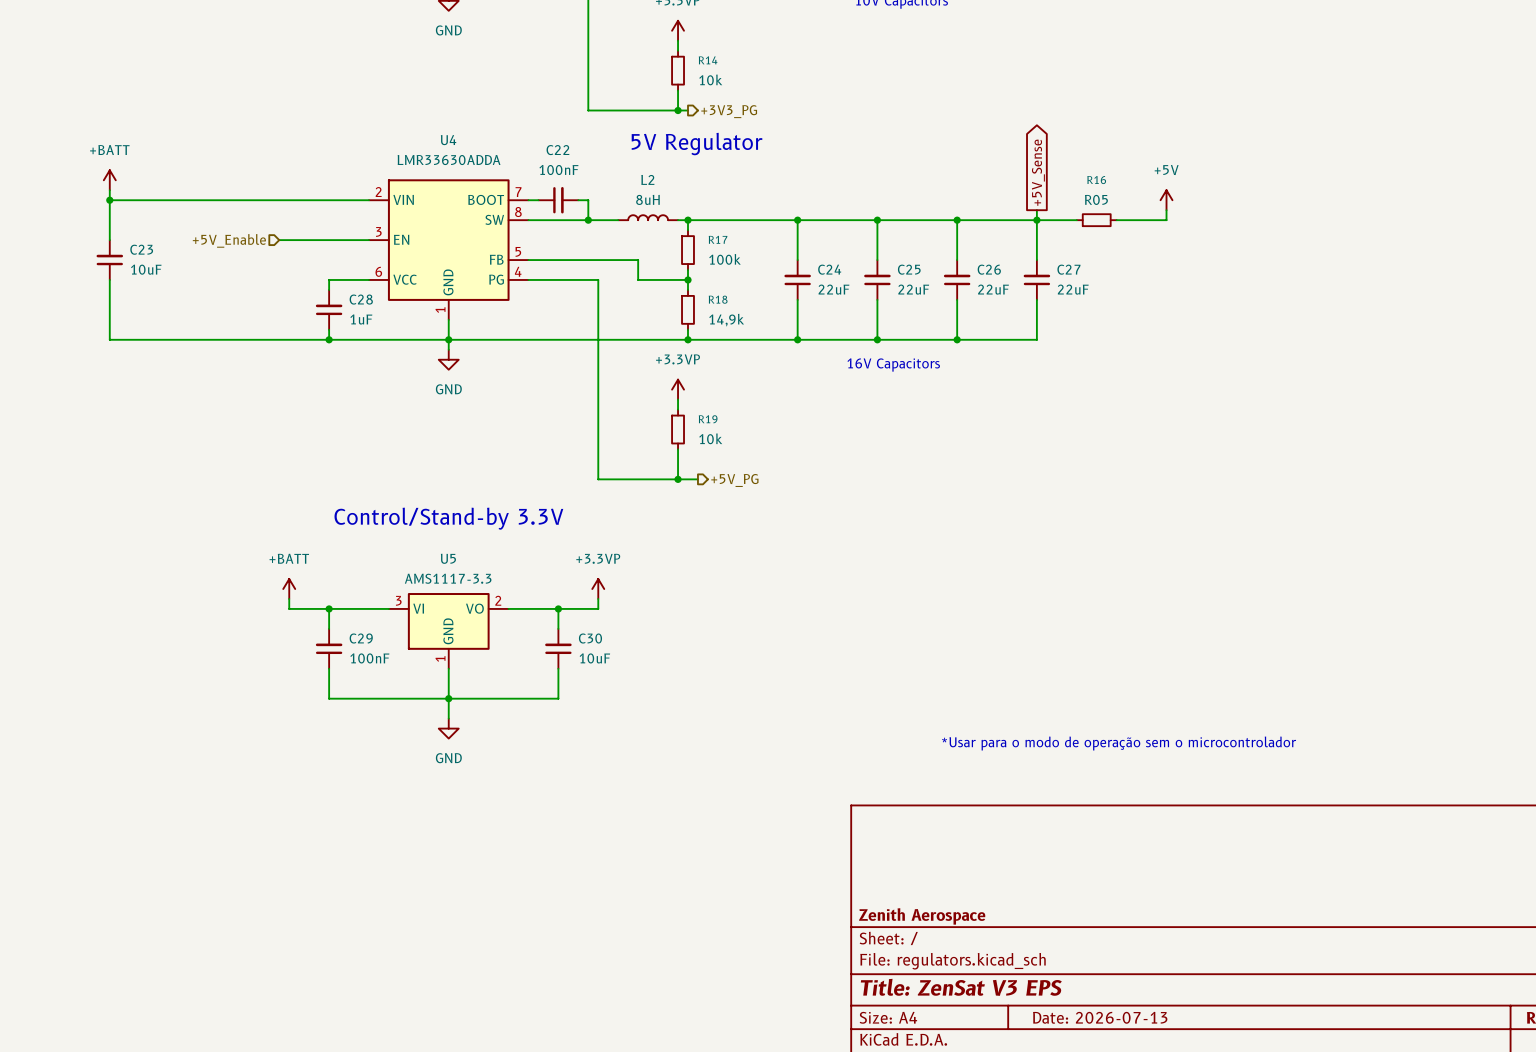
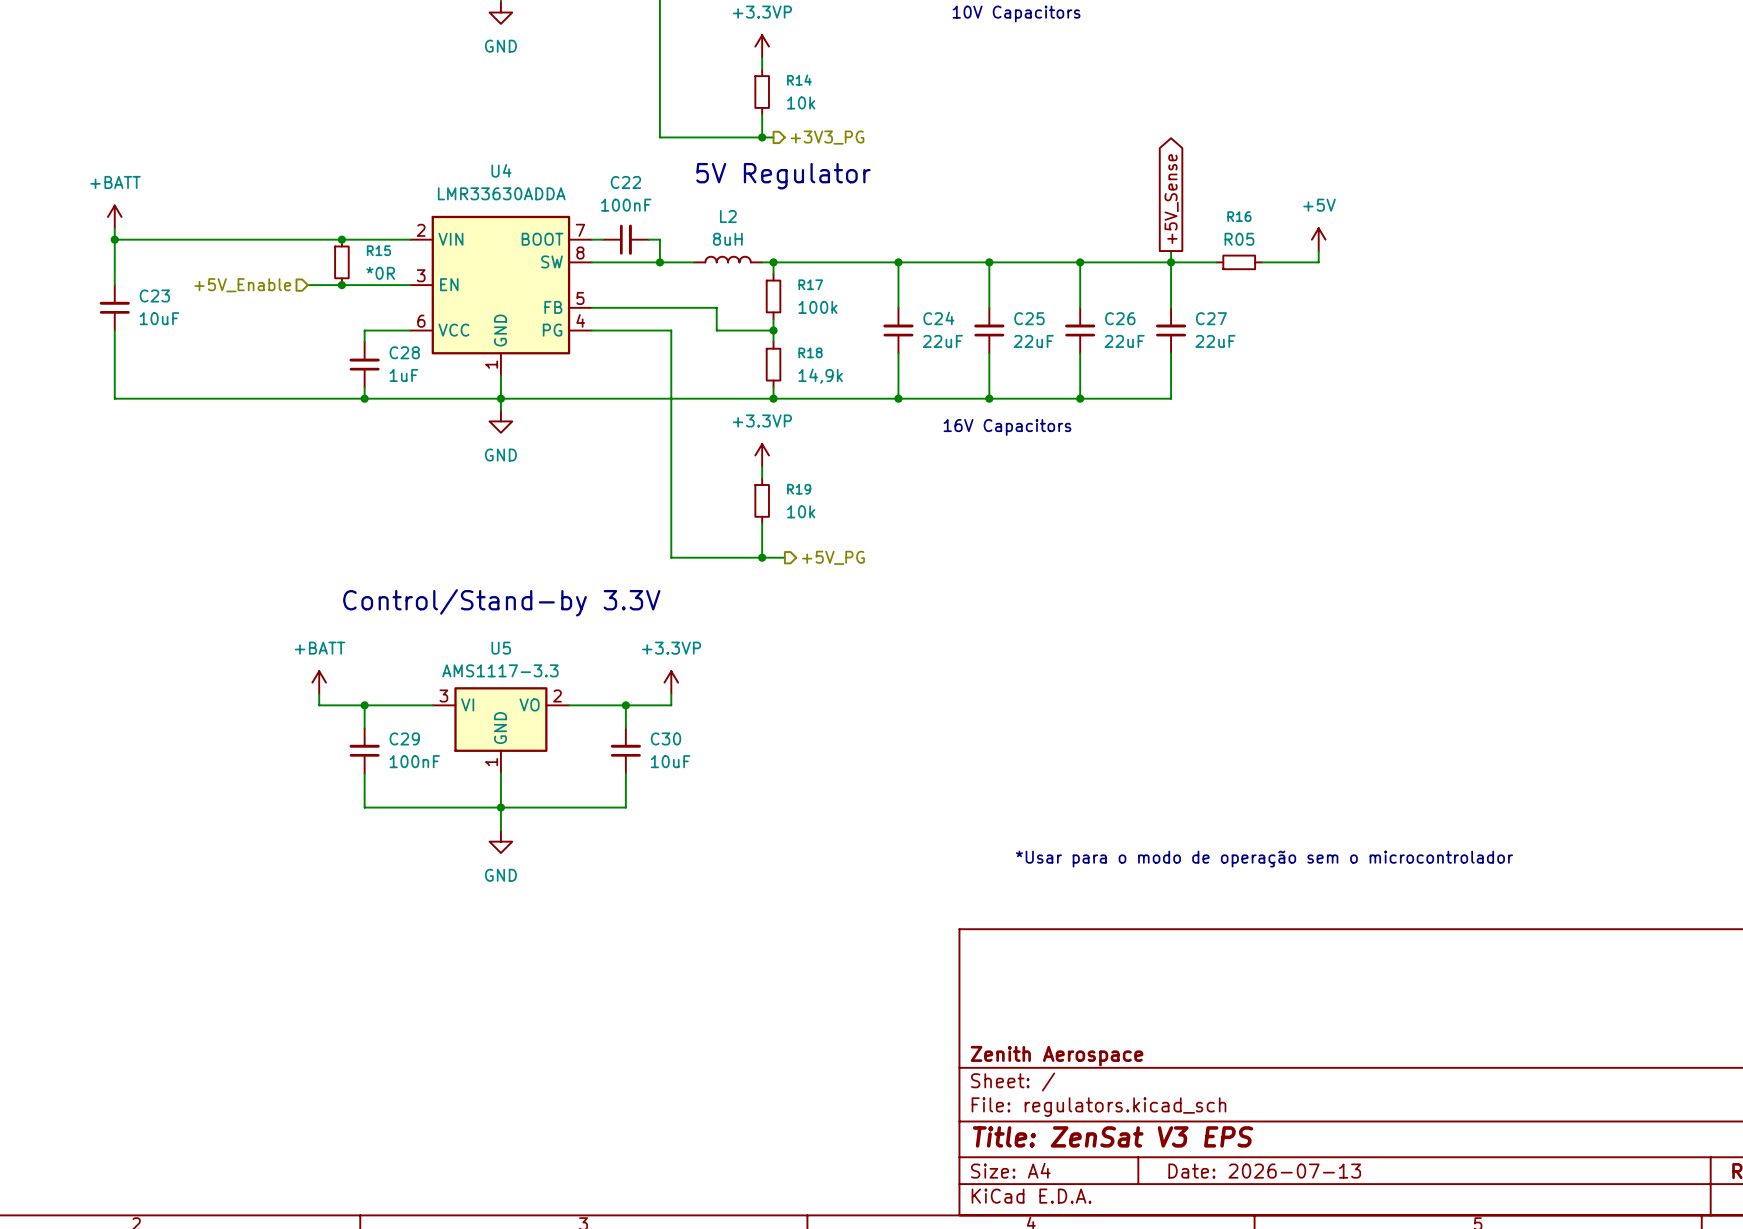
junction: none -> (341, 239)
R15: none -> *0R (341, 262)
junction: none -> (341, 285)

